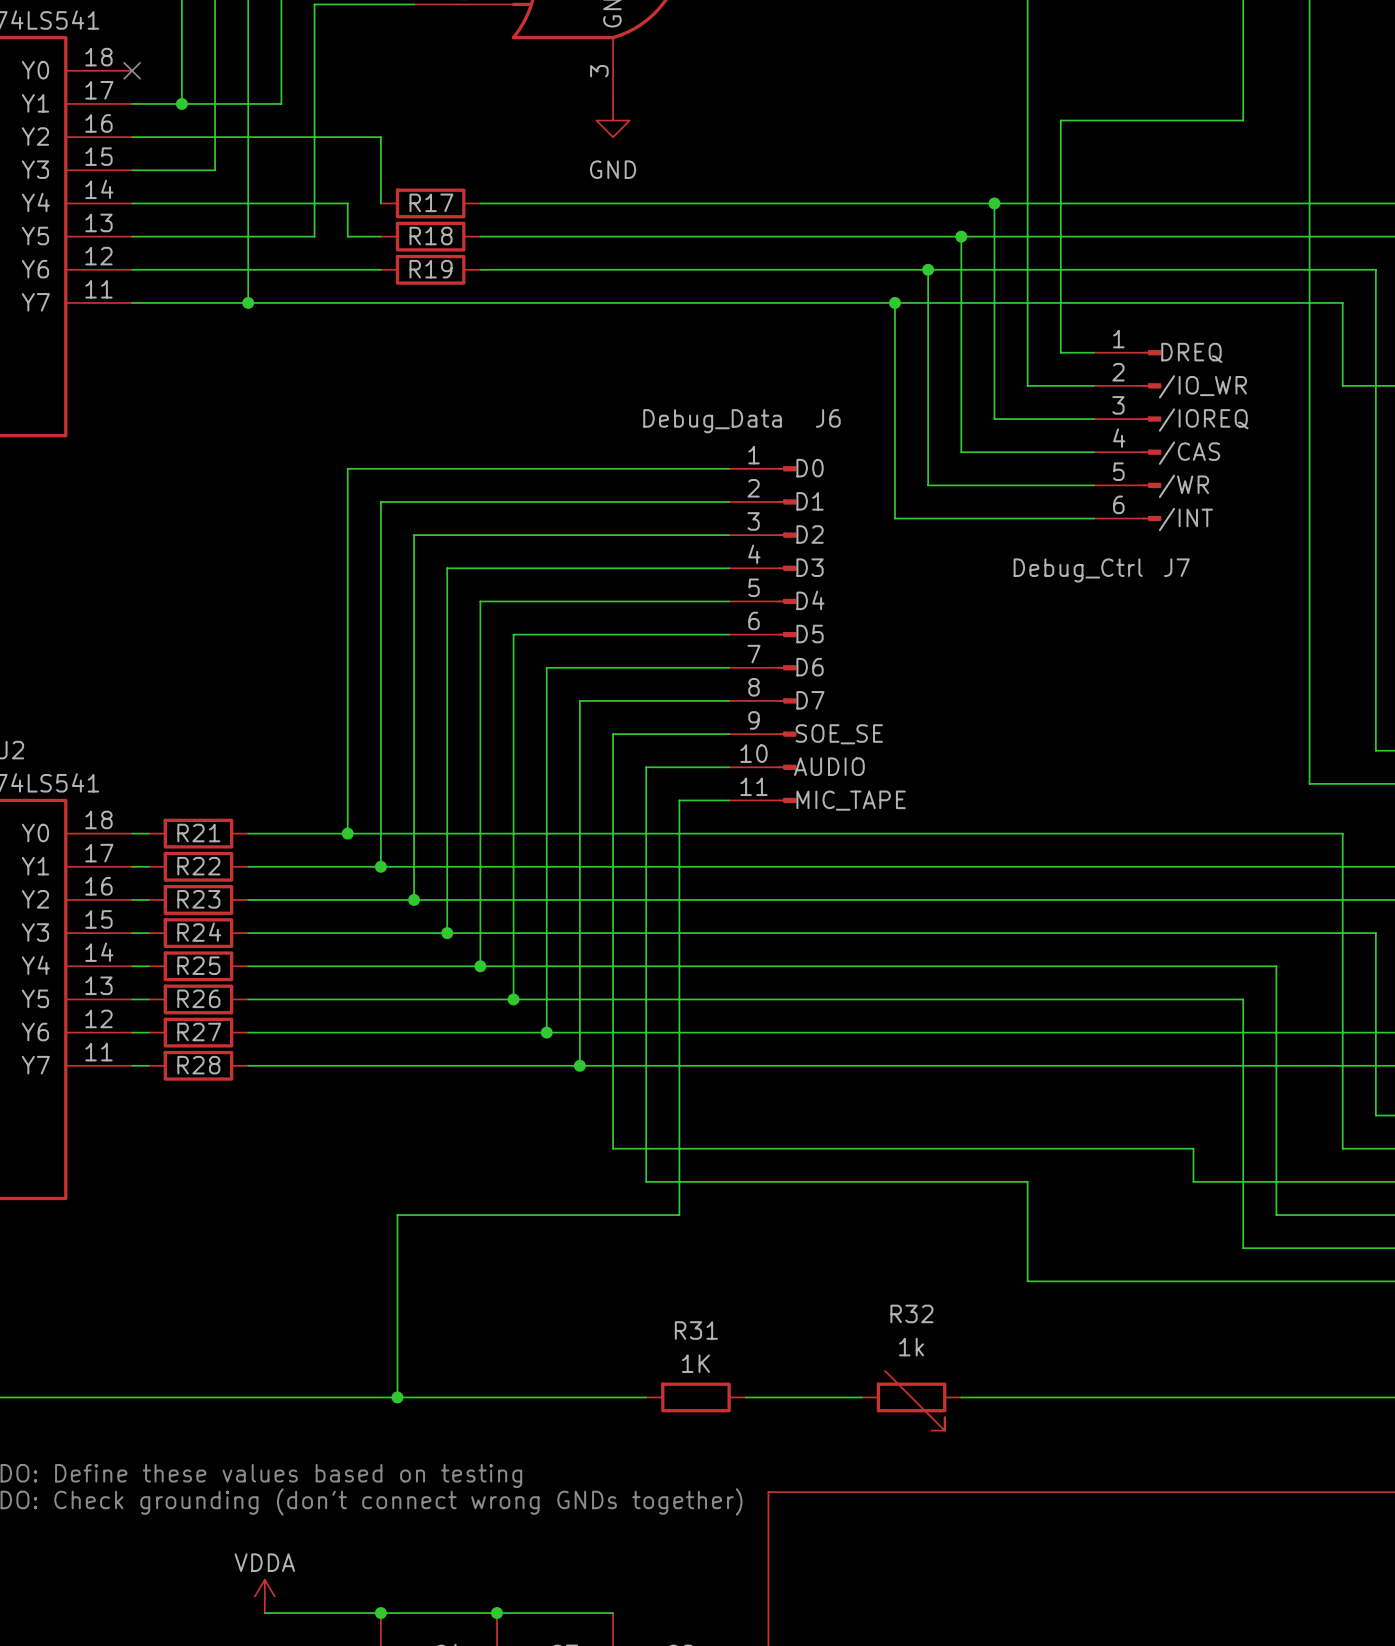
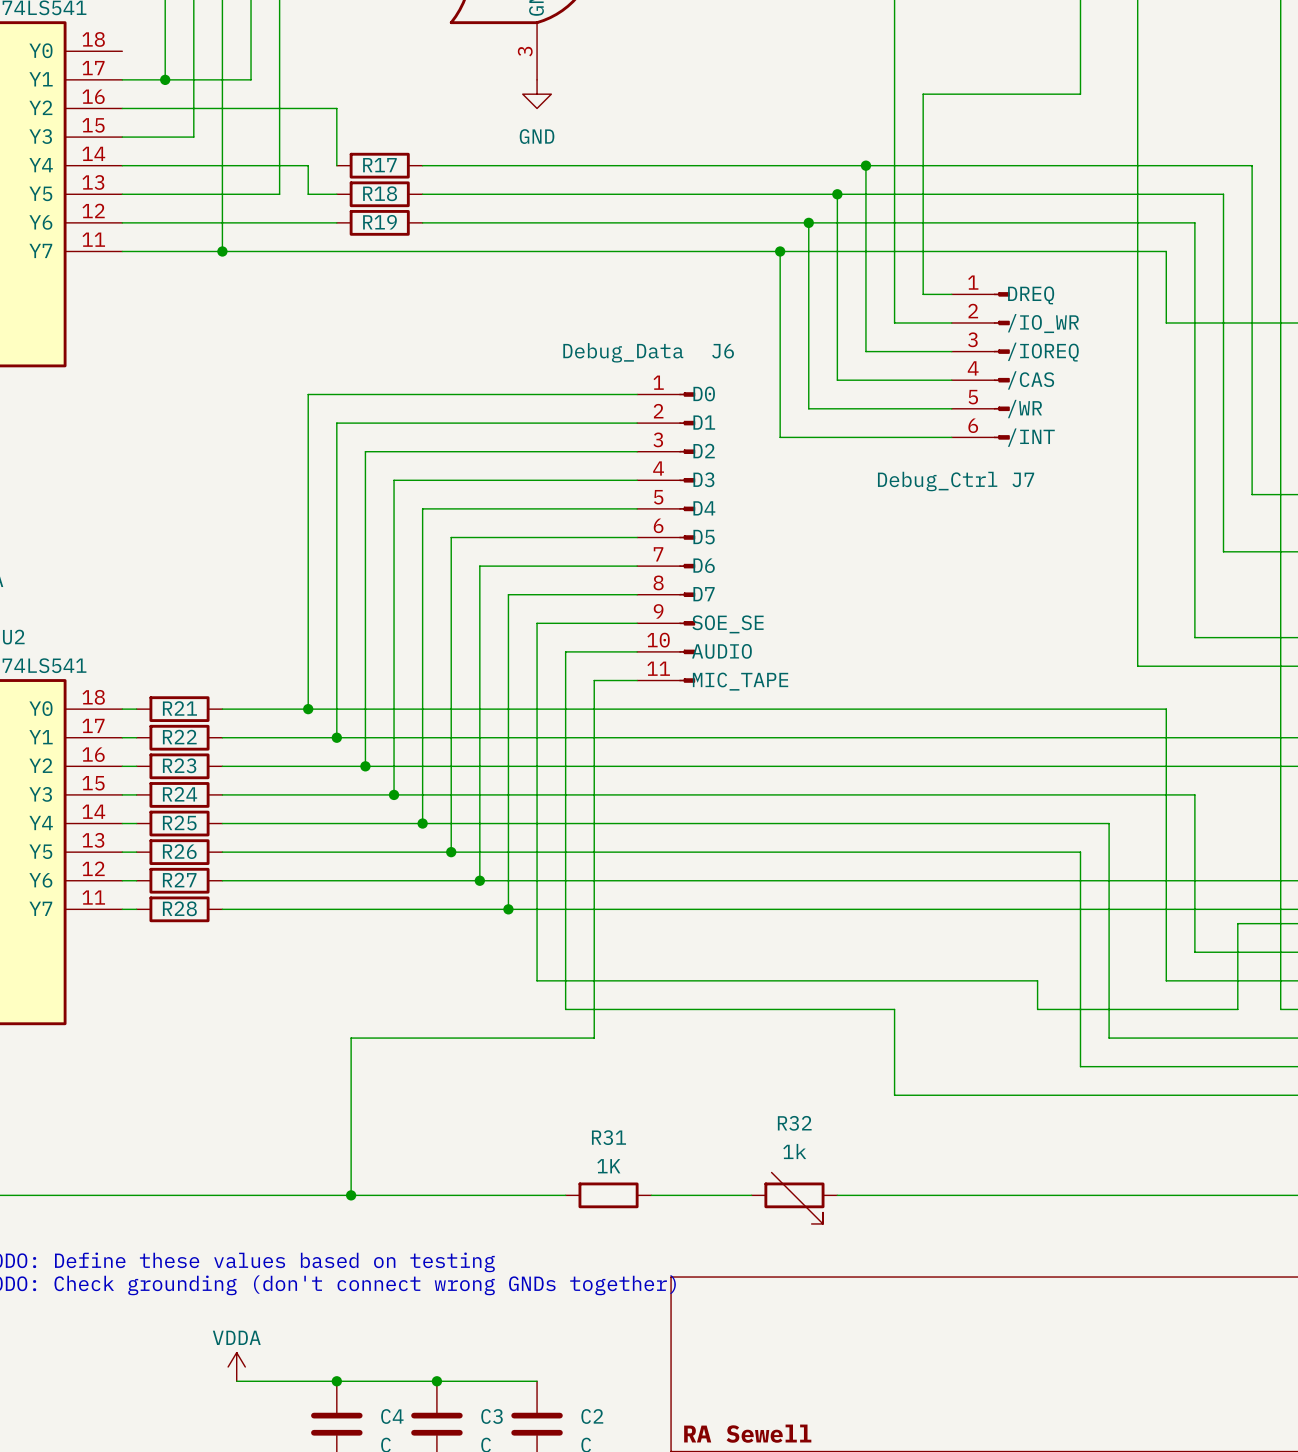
no-connect mark: (132, 70) -> none

